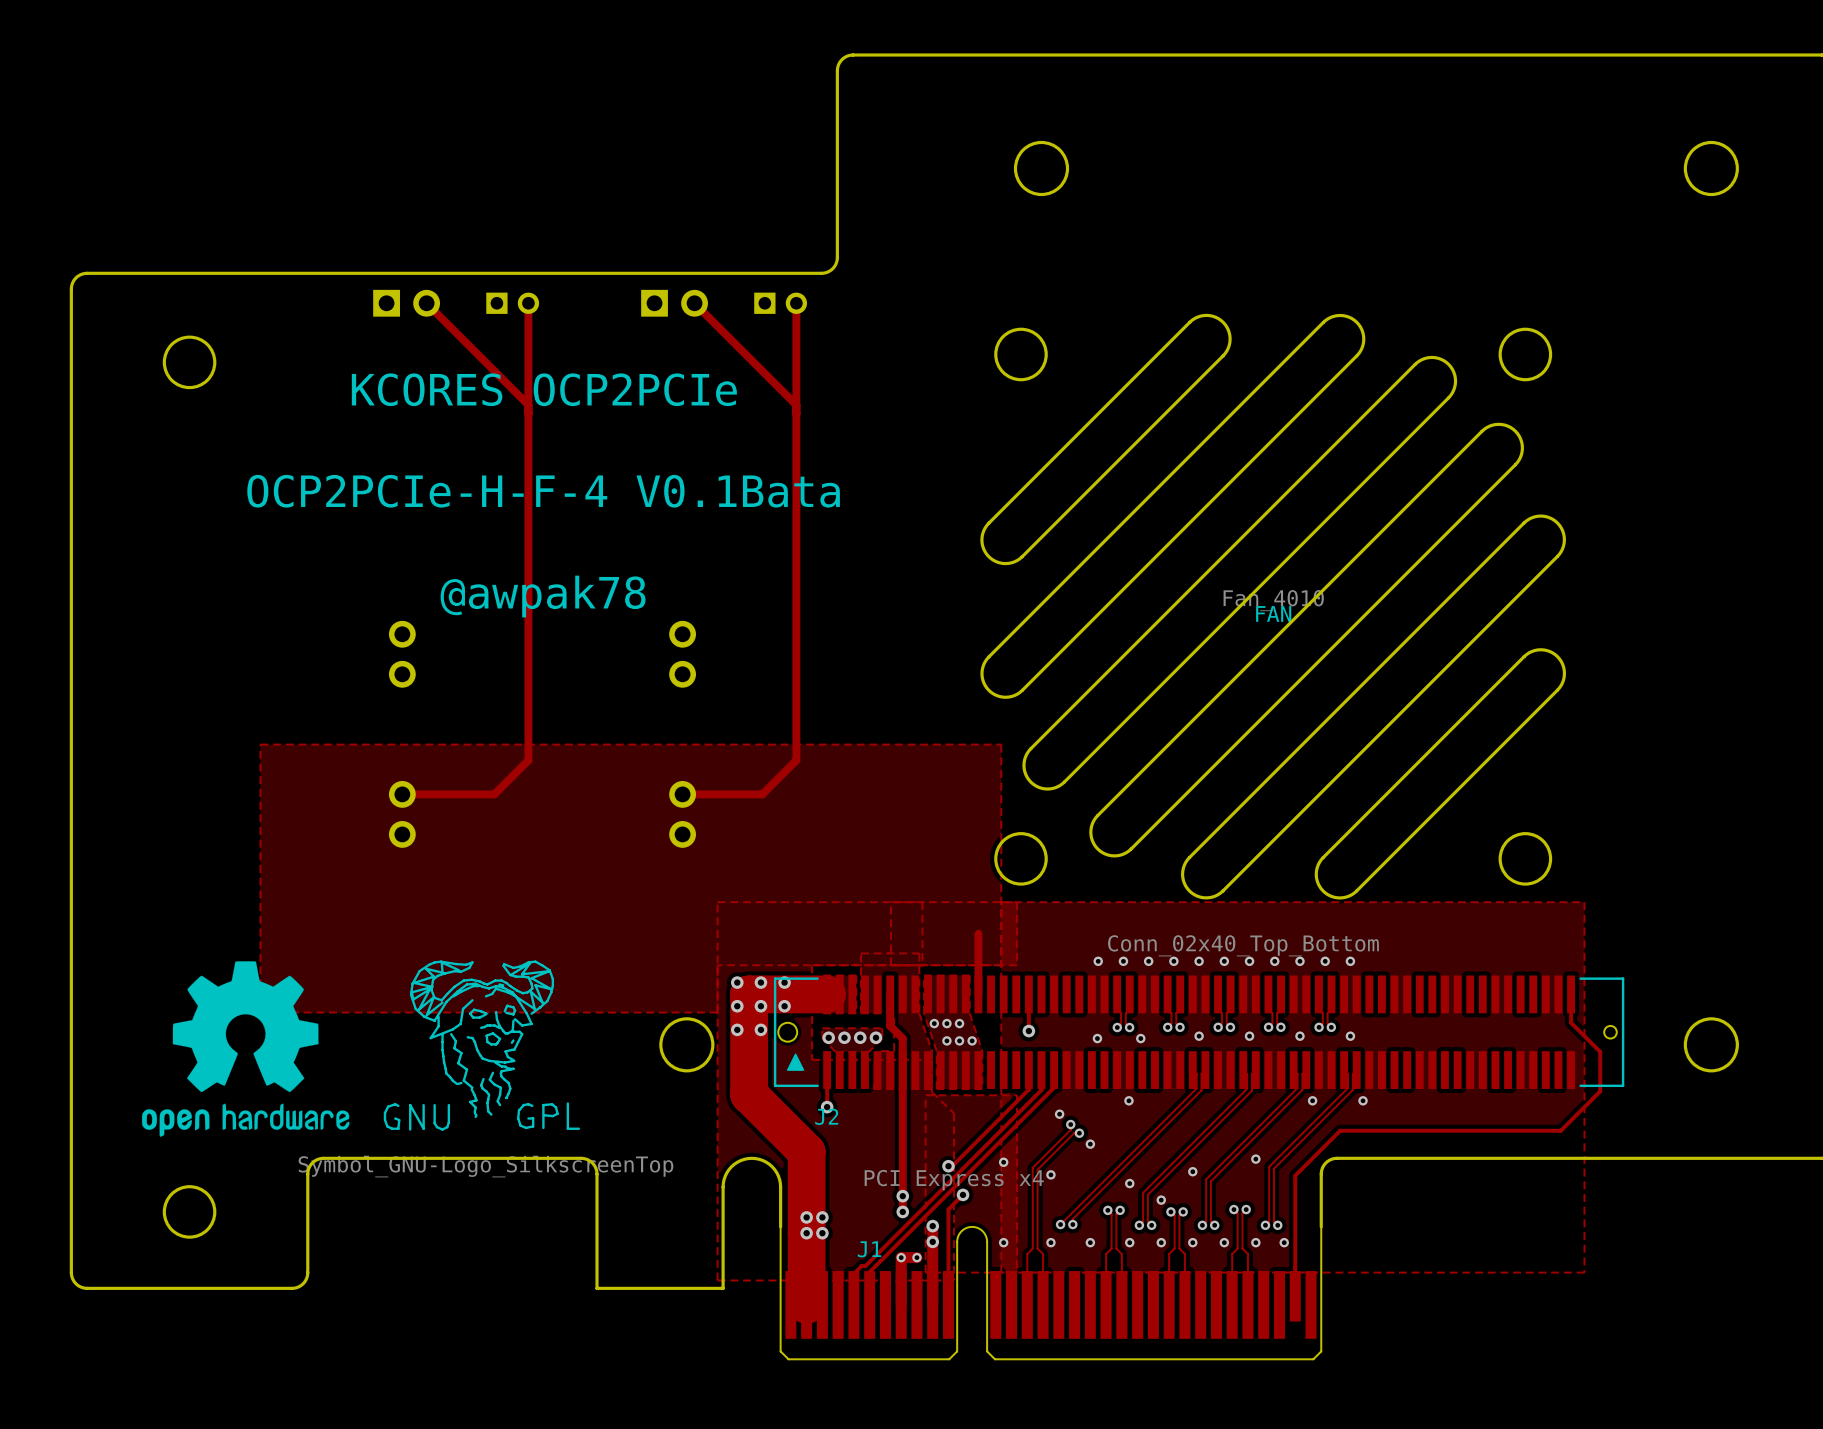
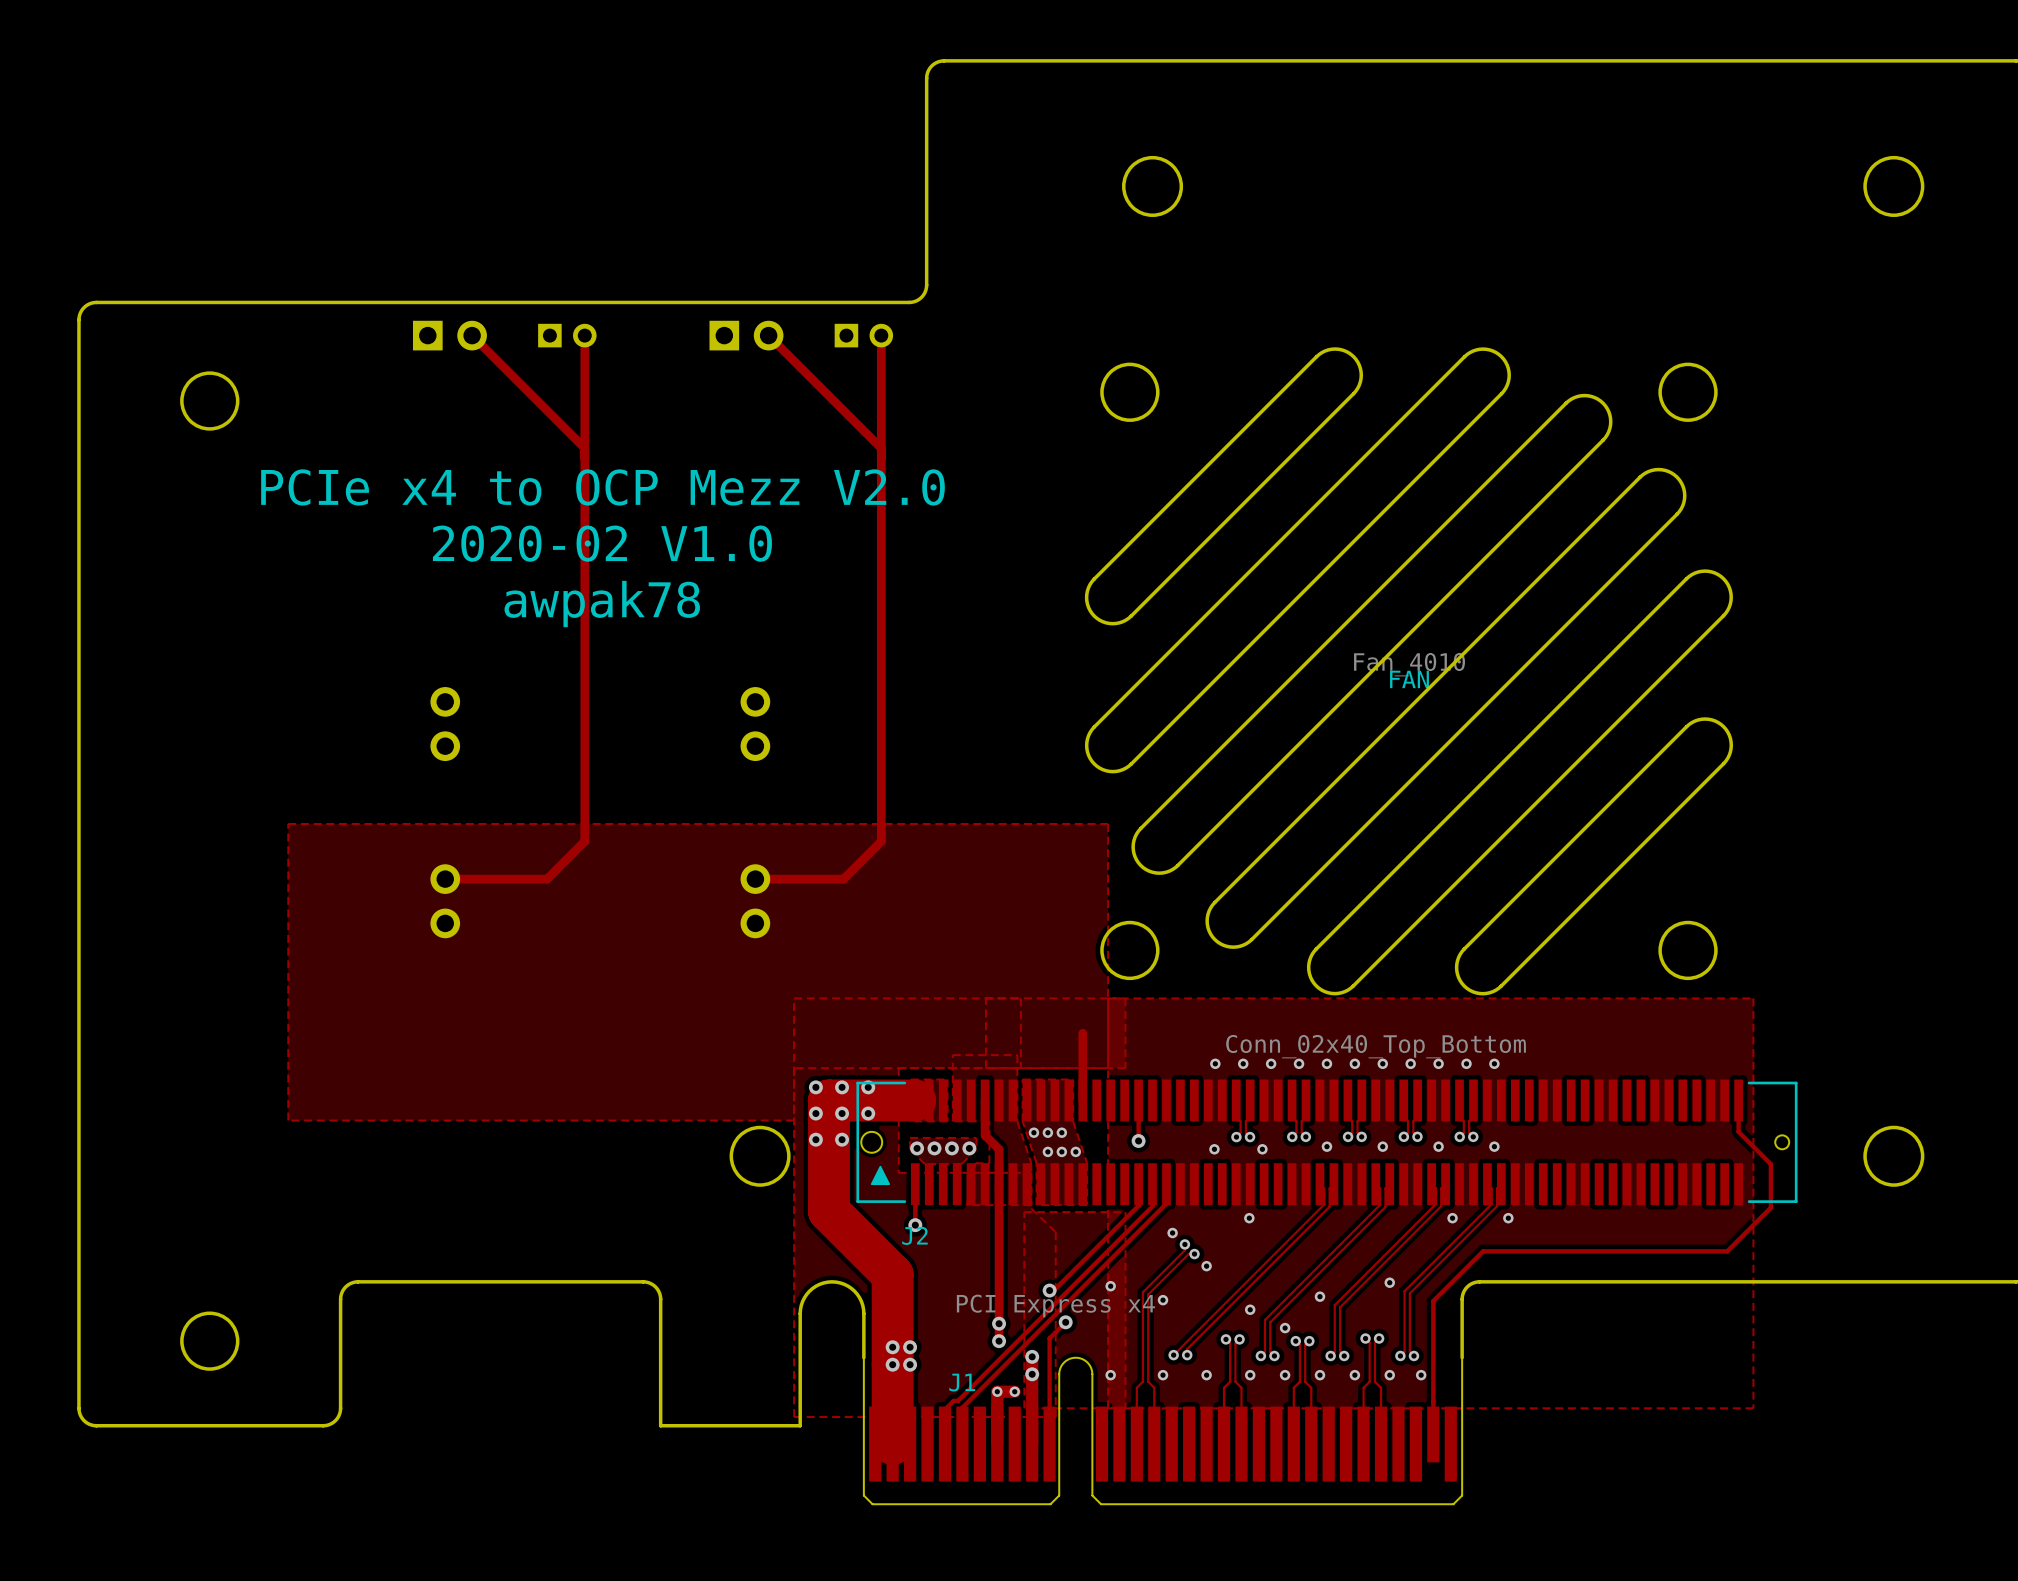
text: KCORES OCP2PCIe (544, 389) -> none
text: none -> PCIe x4 to OCP Mezz V2.0 (602, 487)
text: OCP2PCIe-H-F-4 V0.1Bata (543, 491) -> 2020-02 V1.0 (602, 543)
text: @awpak78 (543, 596) -> awpak78 (602, 604)
drawing: [142, 960, 581, 1137] -> none

